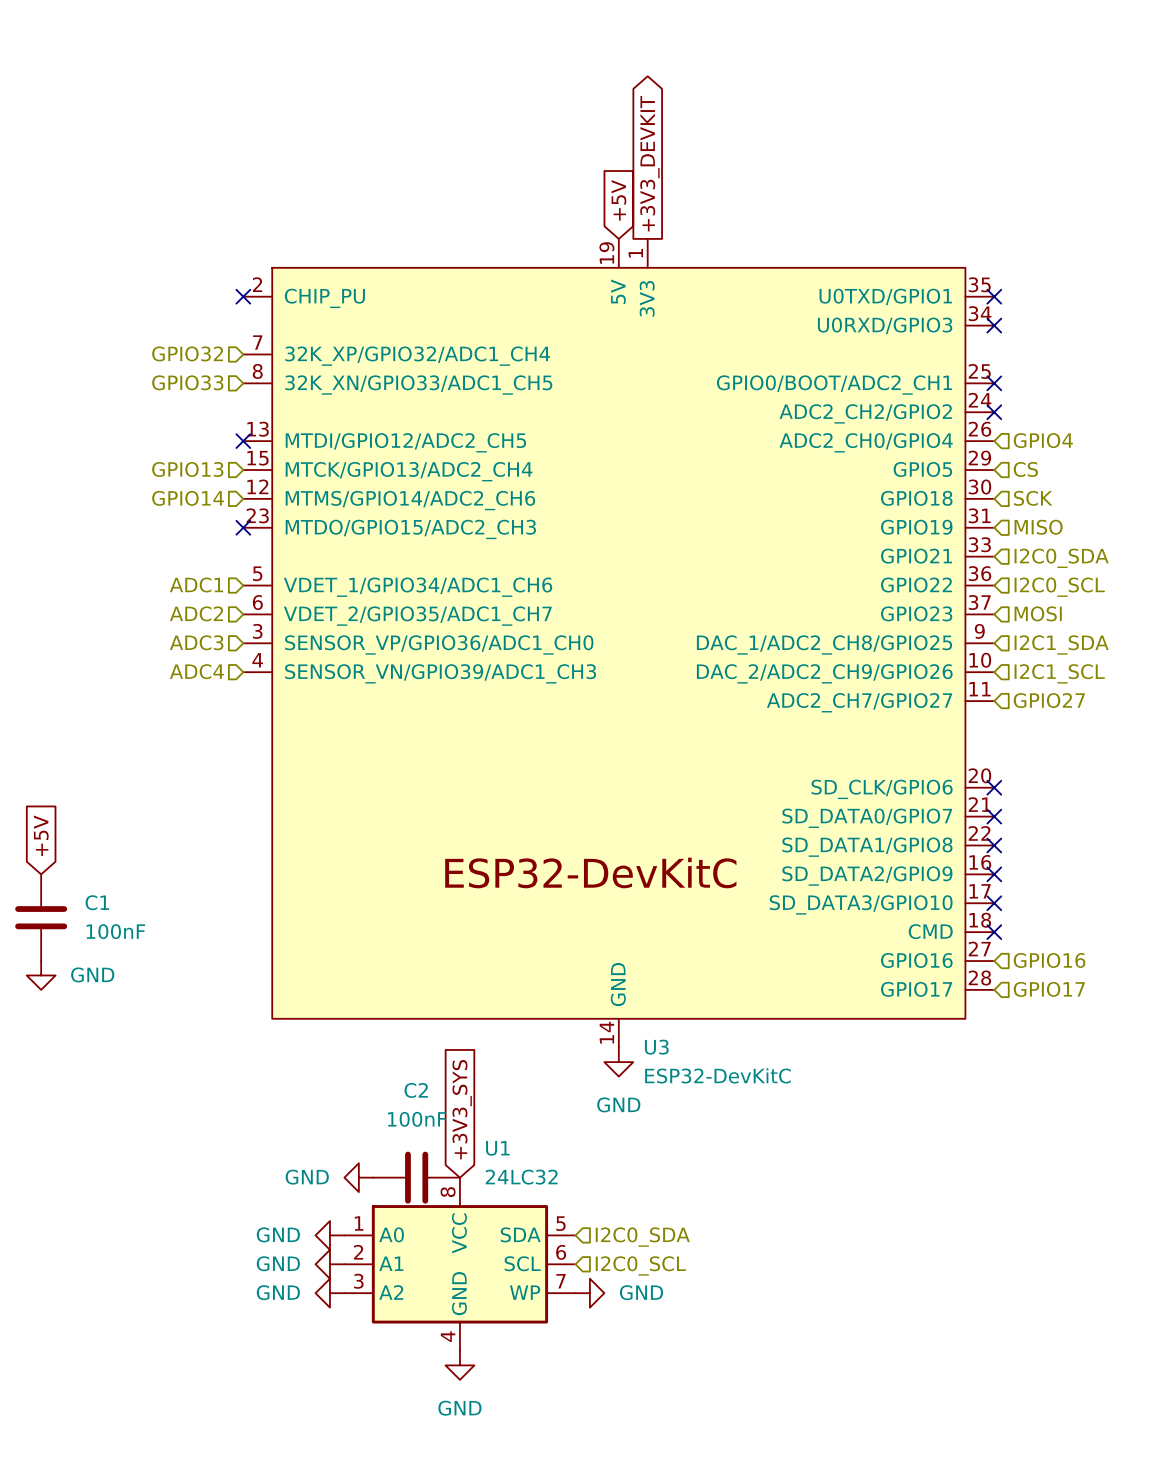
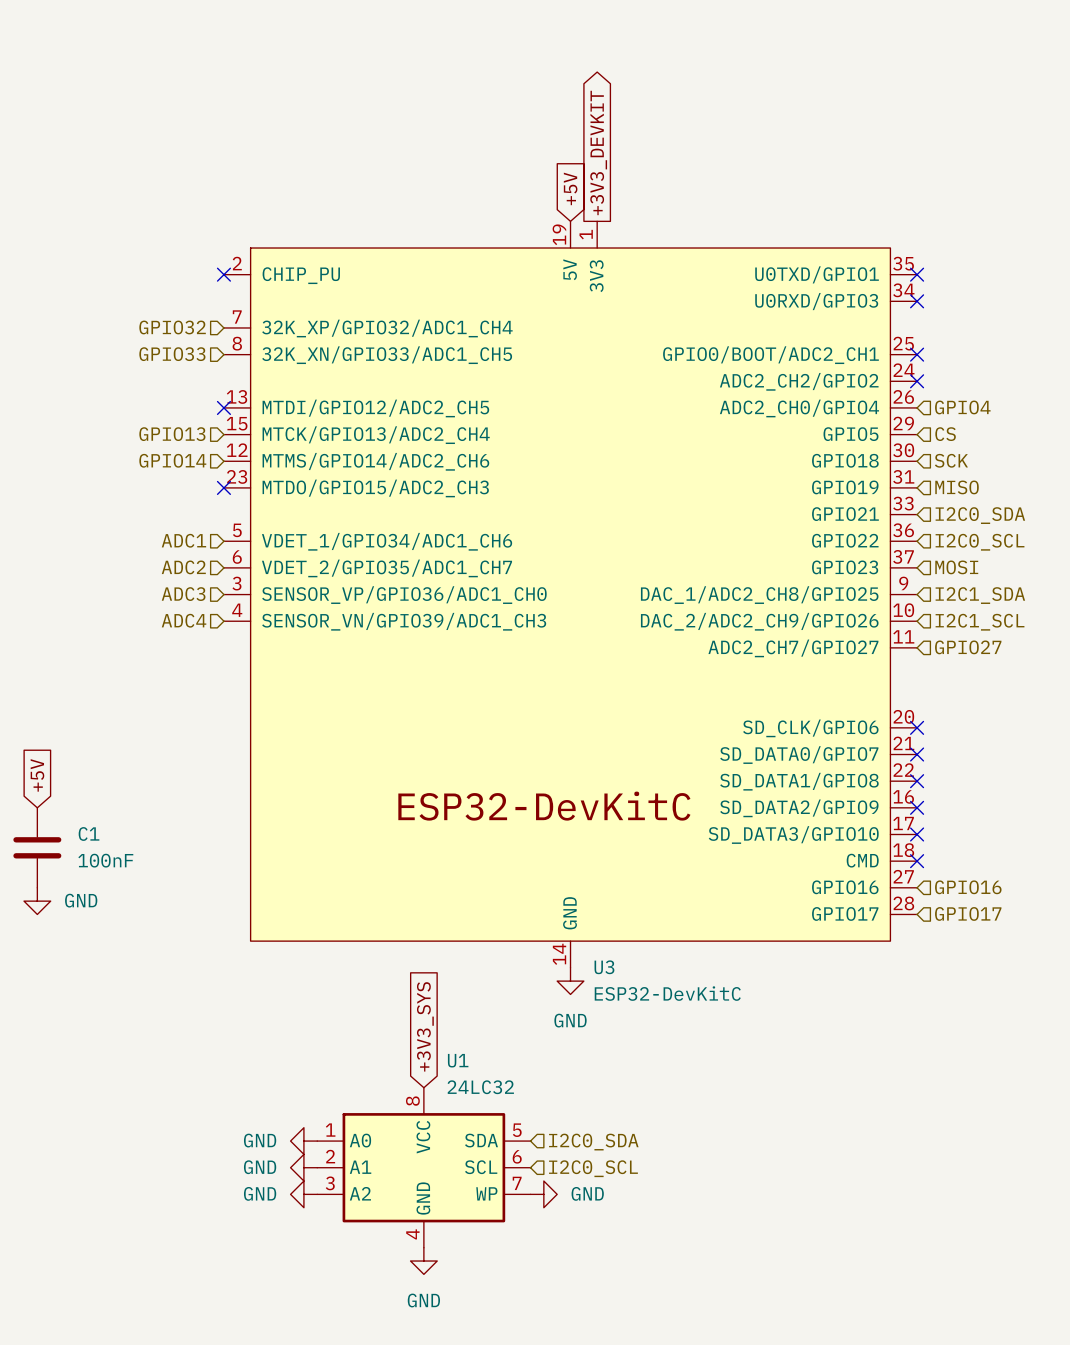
power symbol: GND (358, 1177) -> none
C2: 100nF (416, 1177) -> none

